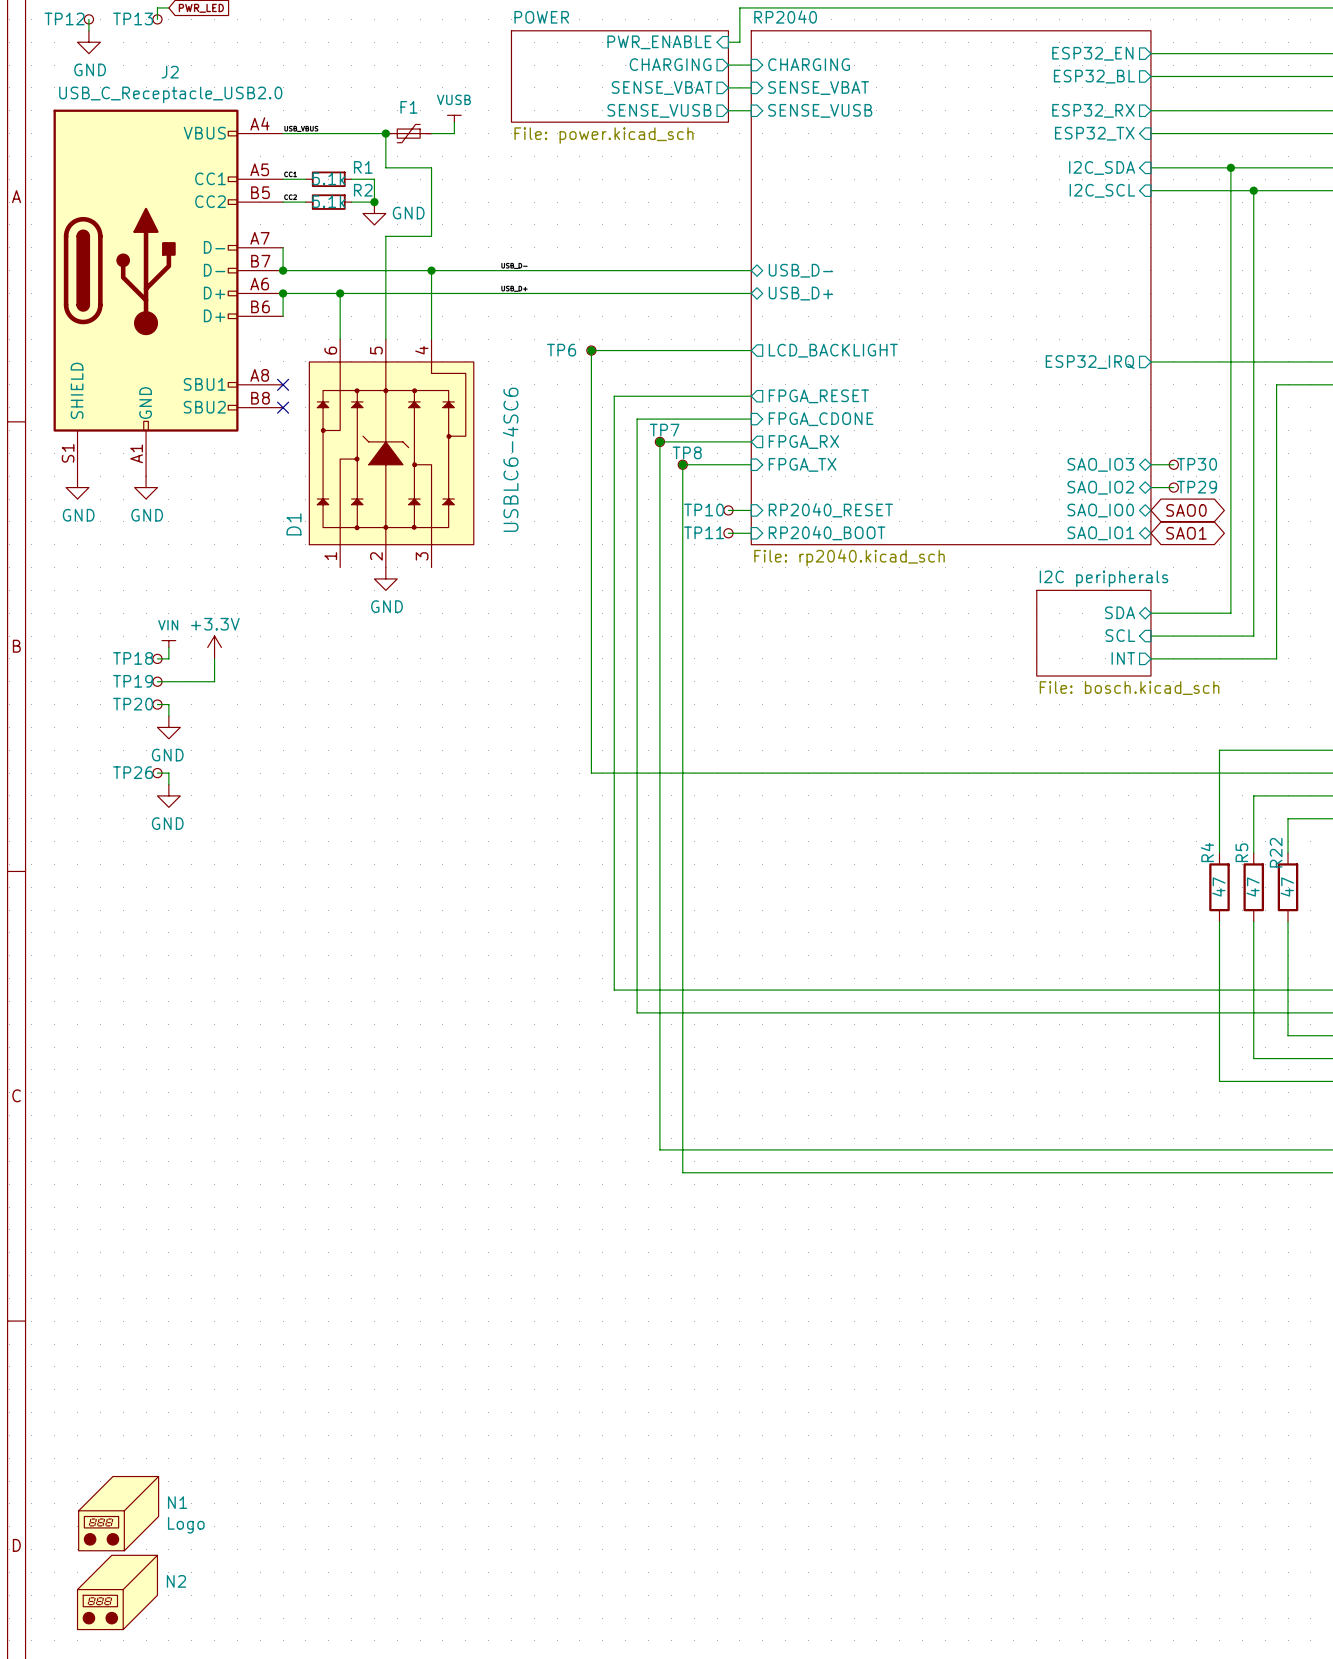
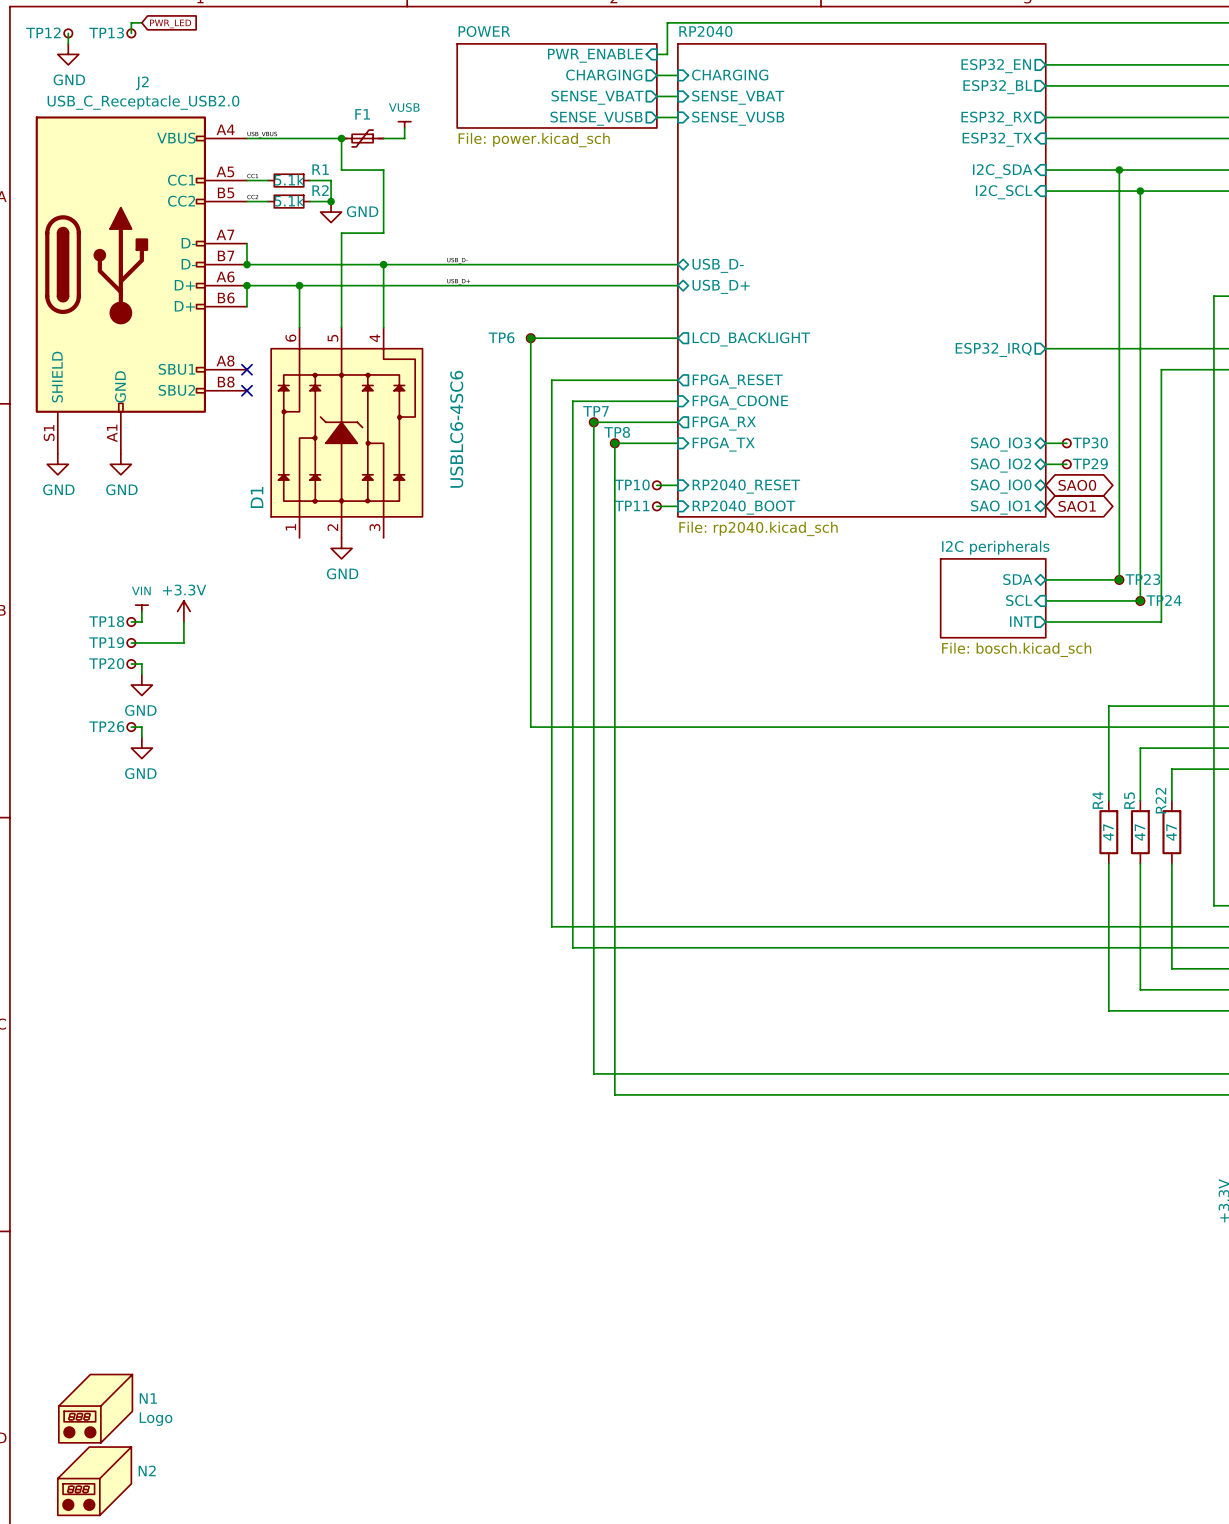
junction: none -> (1119, 579)
TP23: none -> (1119, 579)
junction: none -> (1140, 600)
TP24: none -> (1140, 600)

